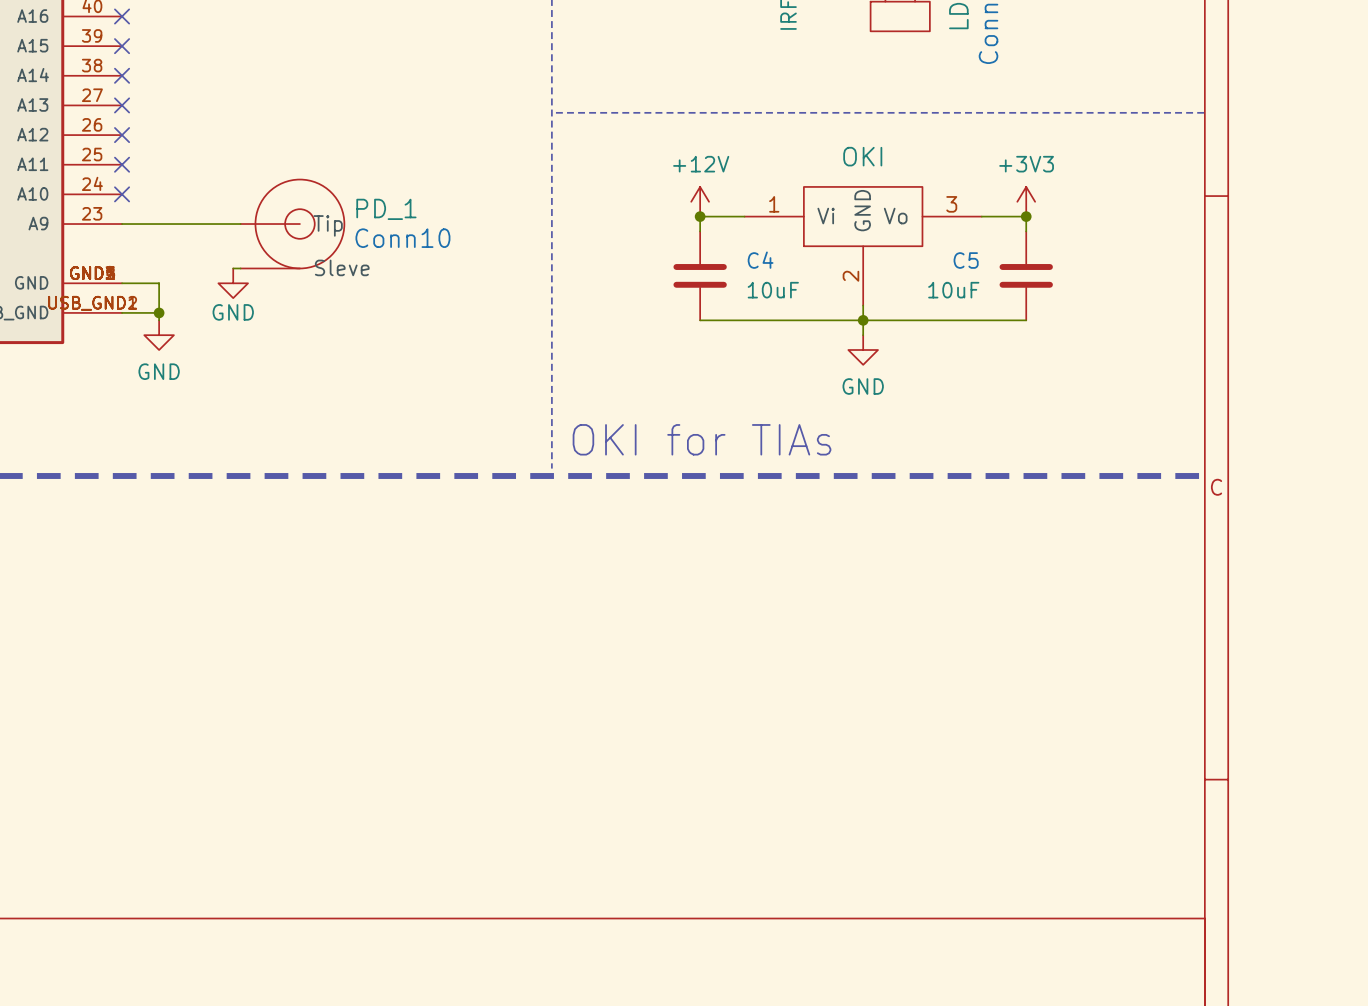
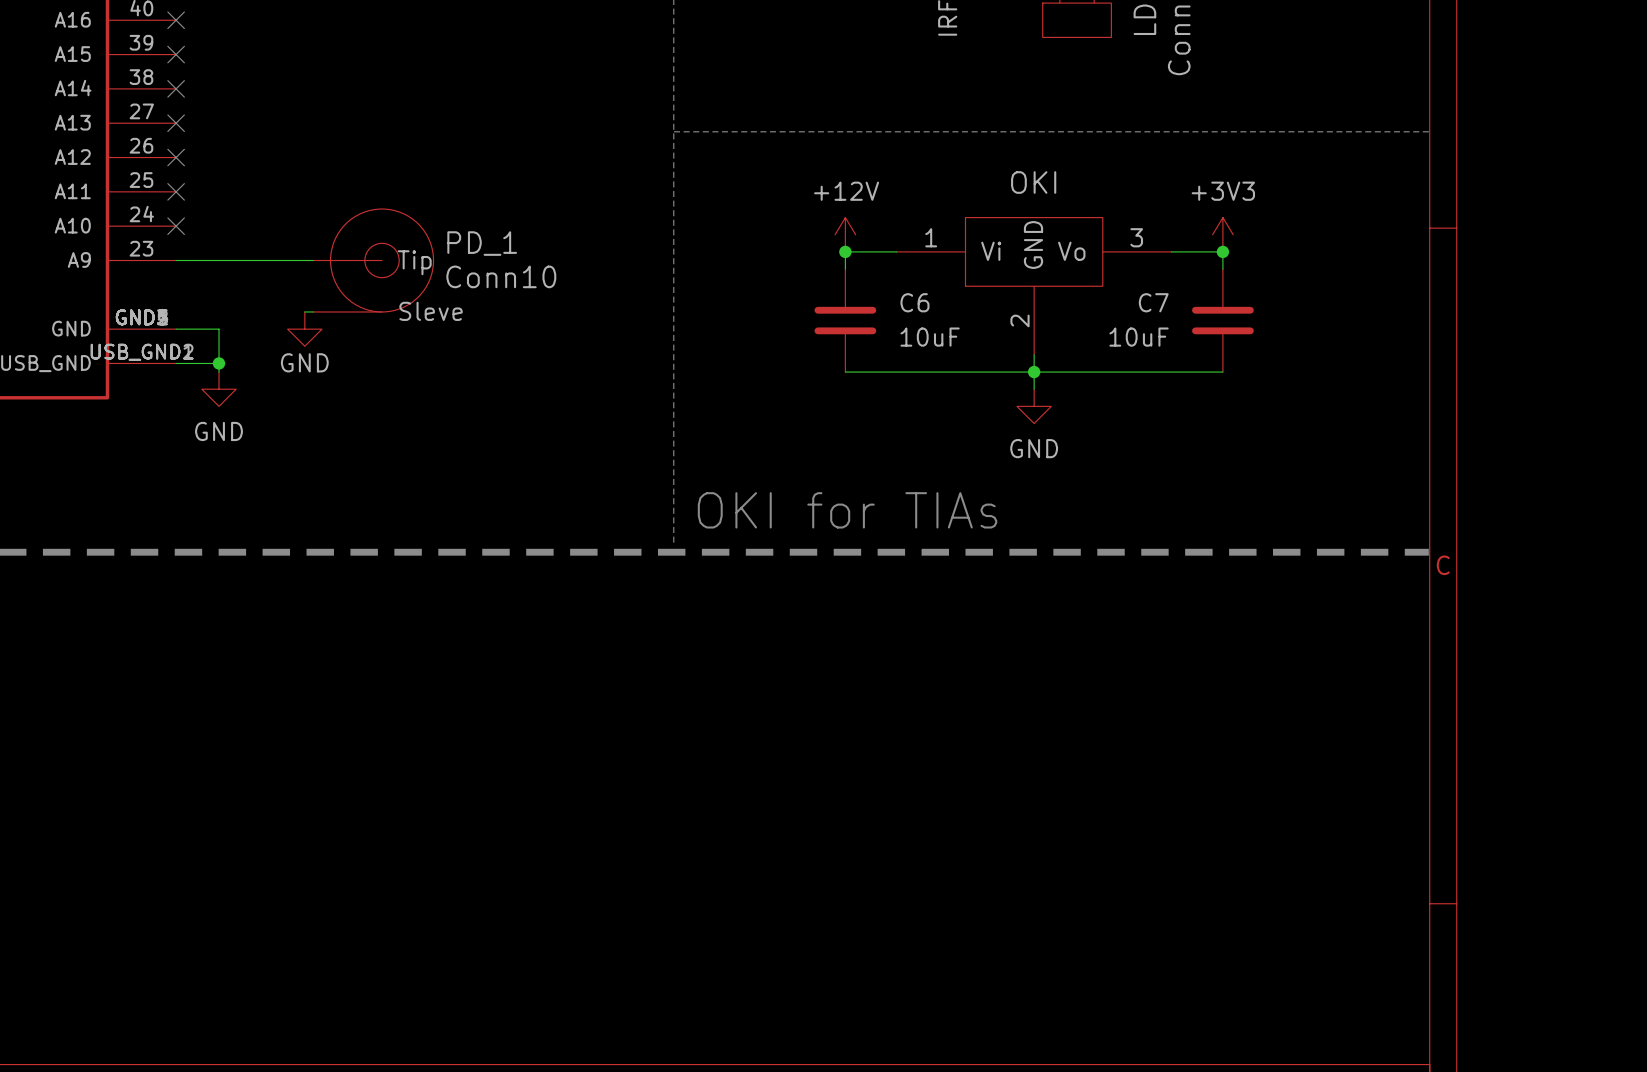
C4 name: C4 (760, 260) -> C6 (914, 302)
C5 name: C5 (966, 260) -> C7 (1153, 302)

